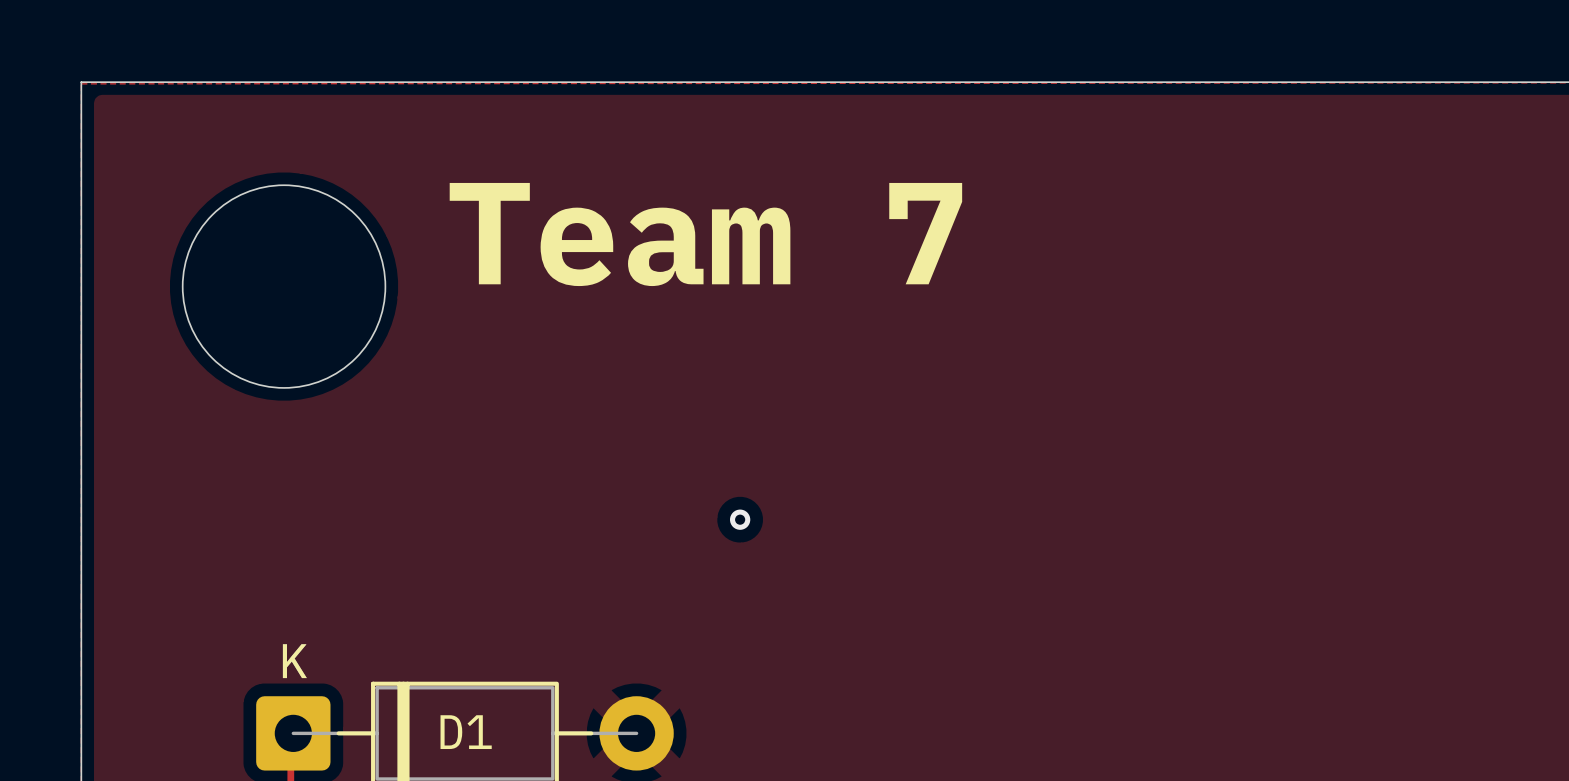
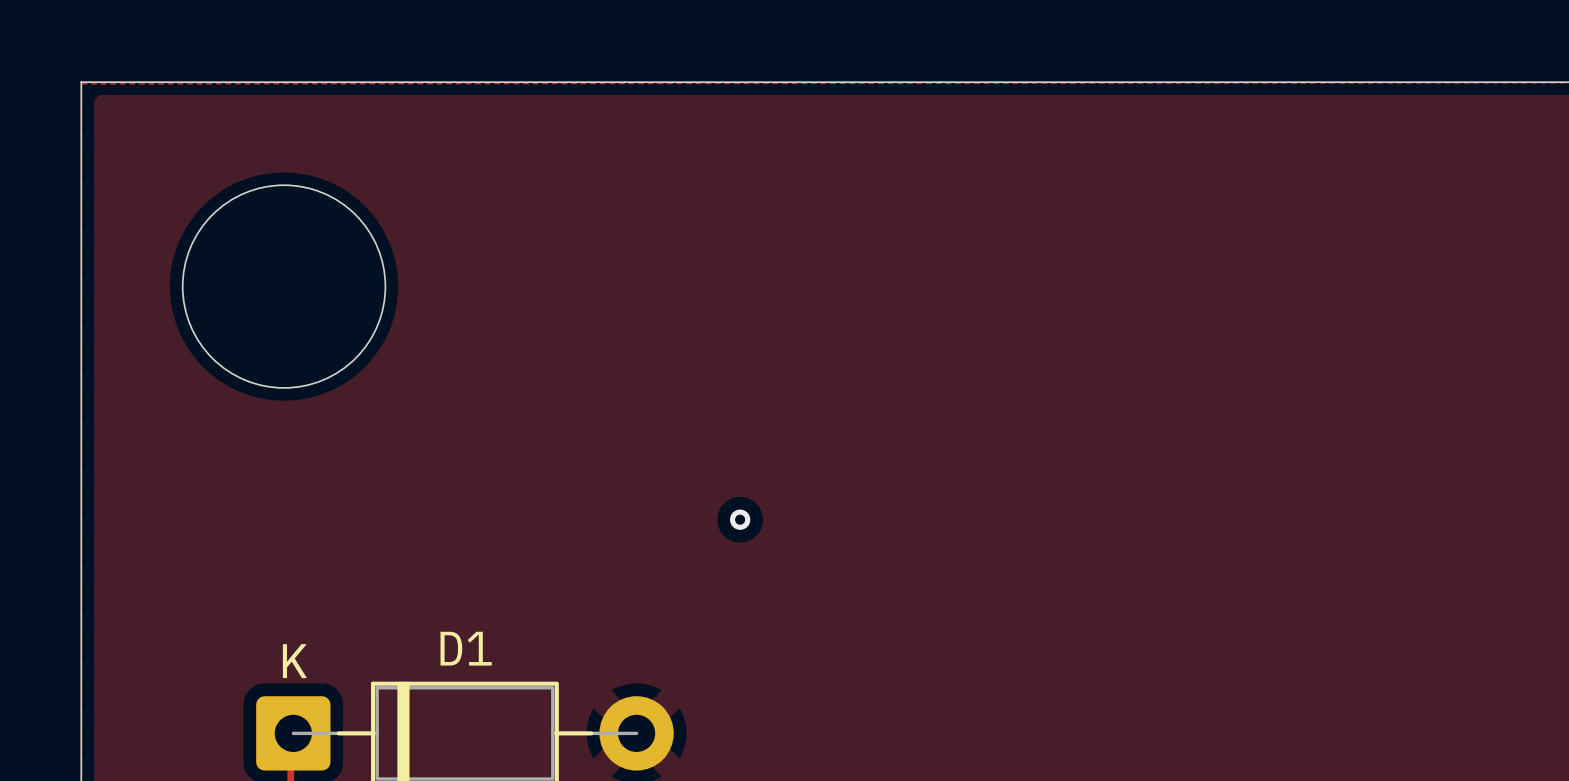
text: Team 7 (705, 234) -> none
D1 name position: D1 (466, 732) -> D1 (466, 648)

